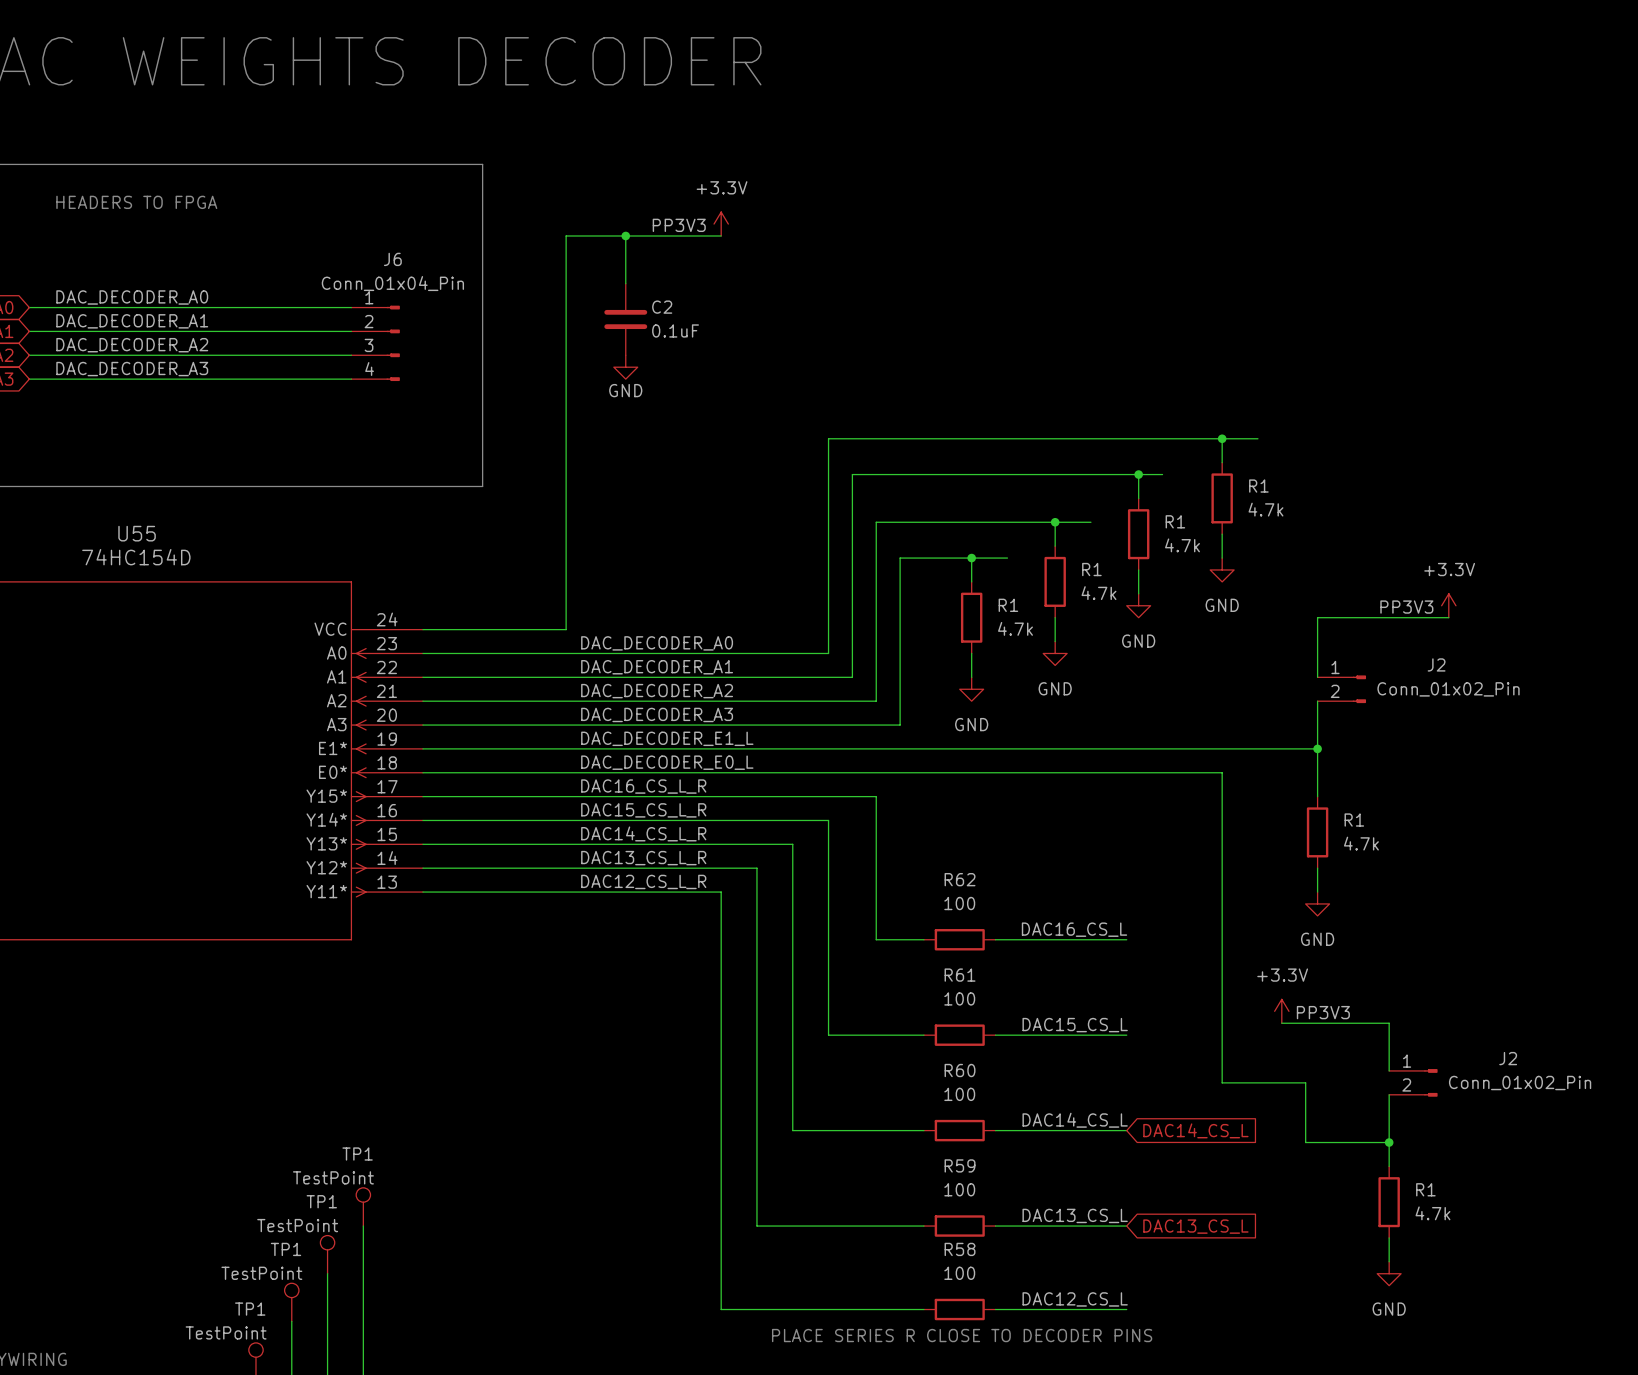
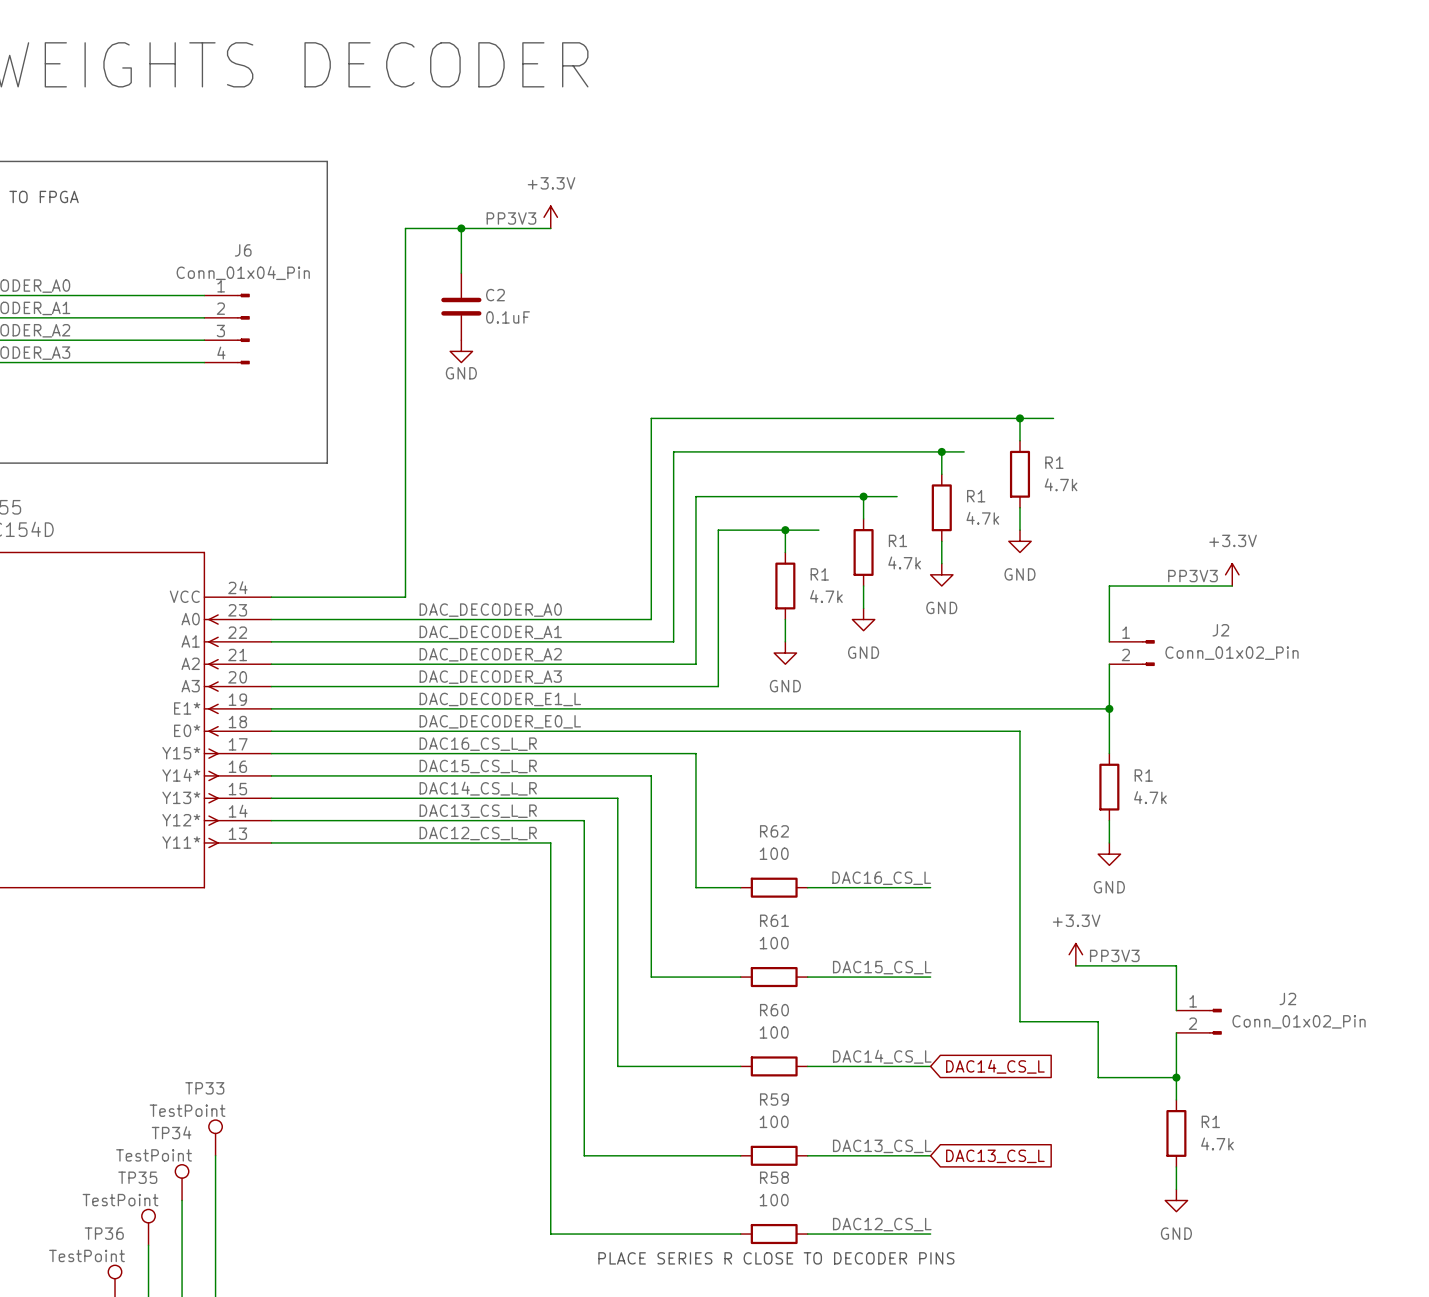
TP1 name: TP1 (357, 1154) -> TP33 (204, 1088)
TP1 name: TP1 (321, 1201) -> TP34 (171, 1132)
TP1 name: TP1 (286, 1249) -> TP35 (137, 1177)
TP1 name: TP1 (250, 1309) -> TP36 (104, 1233)

